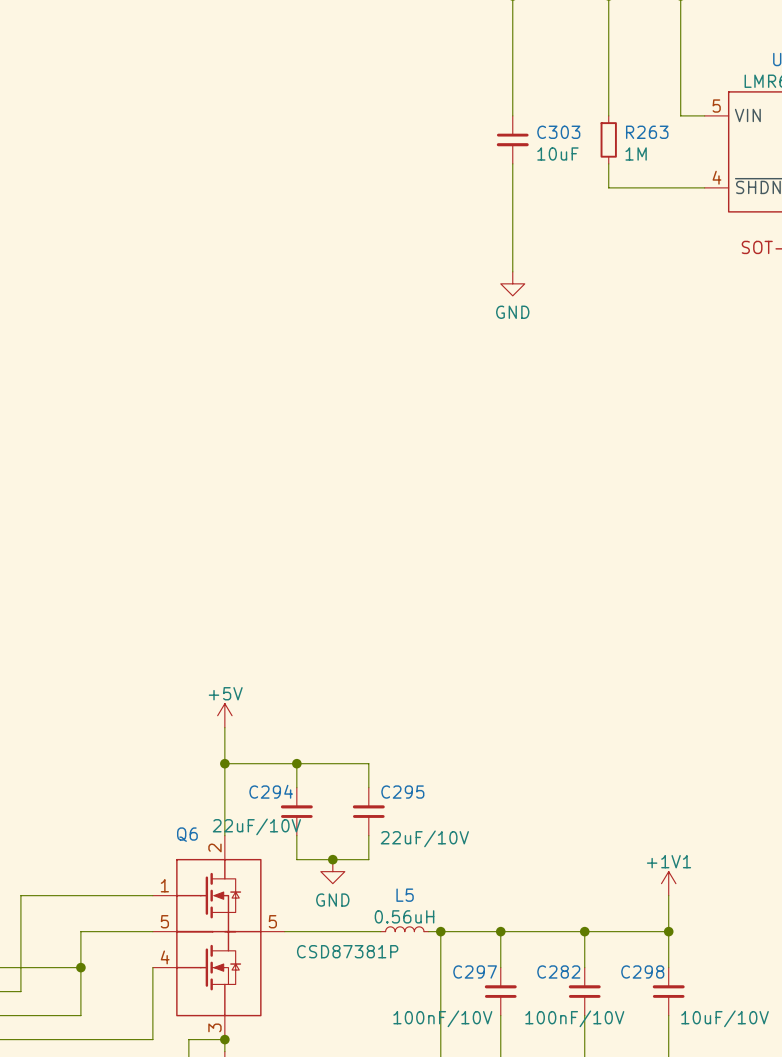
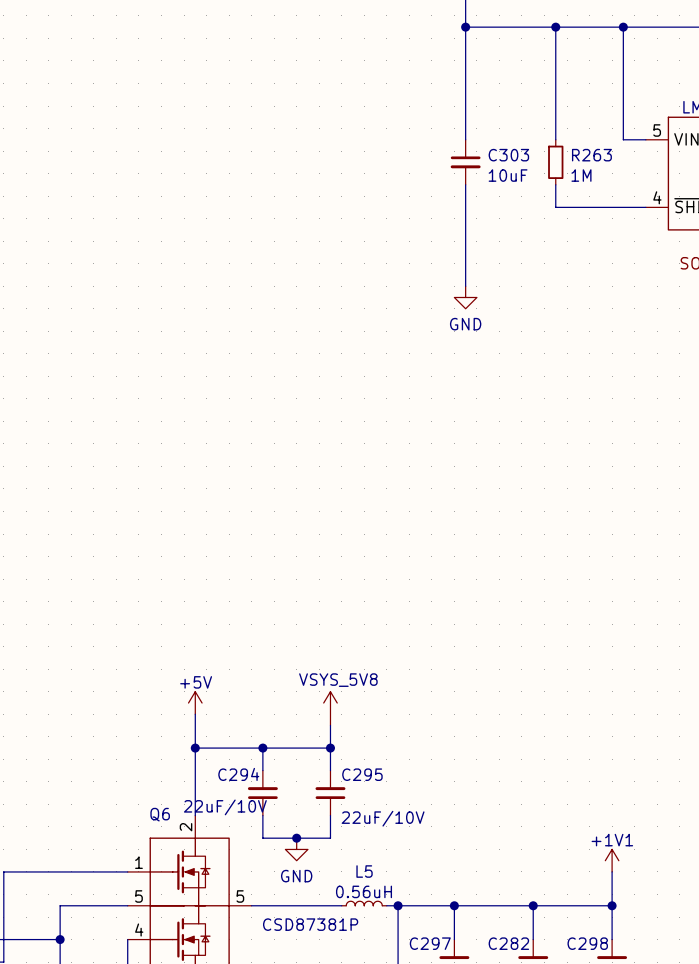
part: none -> VSYS_5V8 (330, 708)
wire: none -> (330, 725) (330, 748)
junction: none -> (330, 748)

